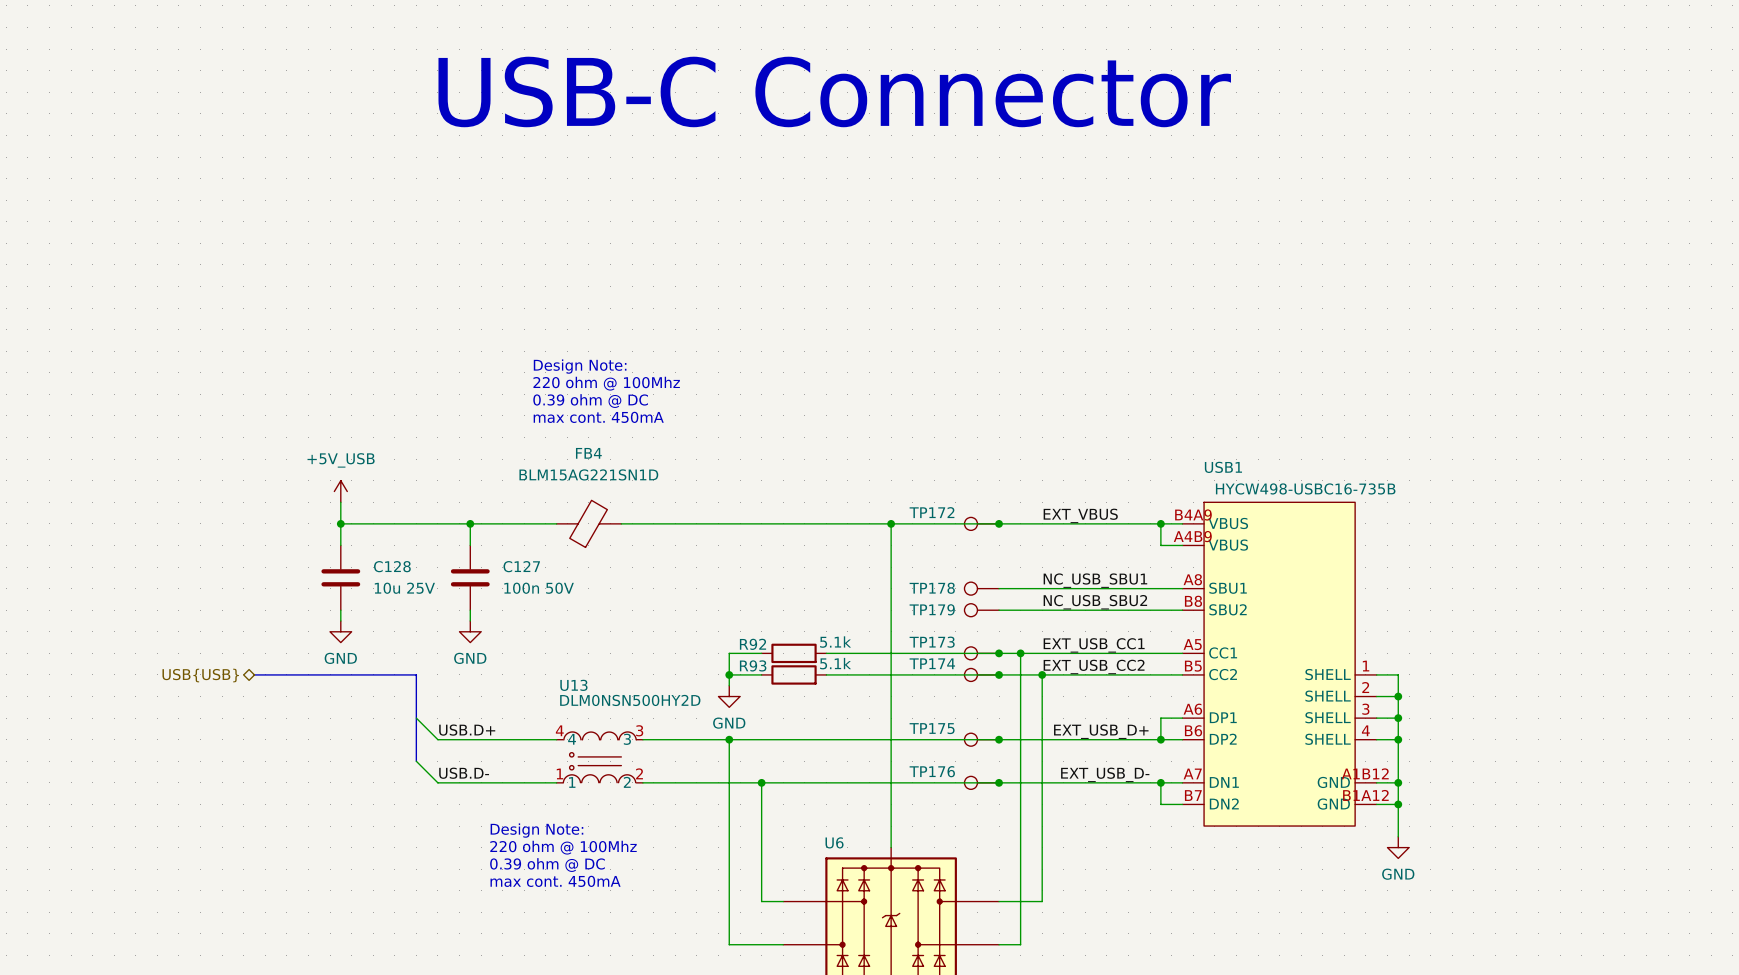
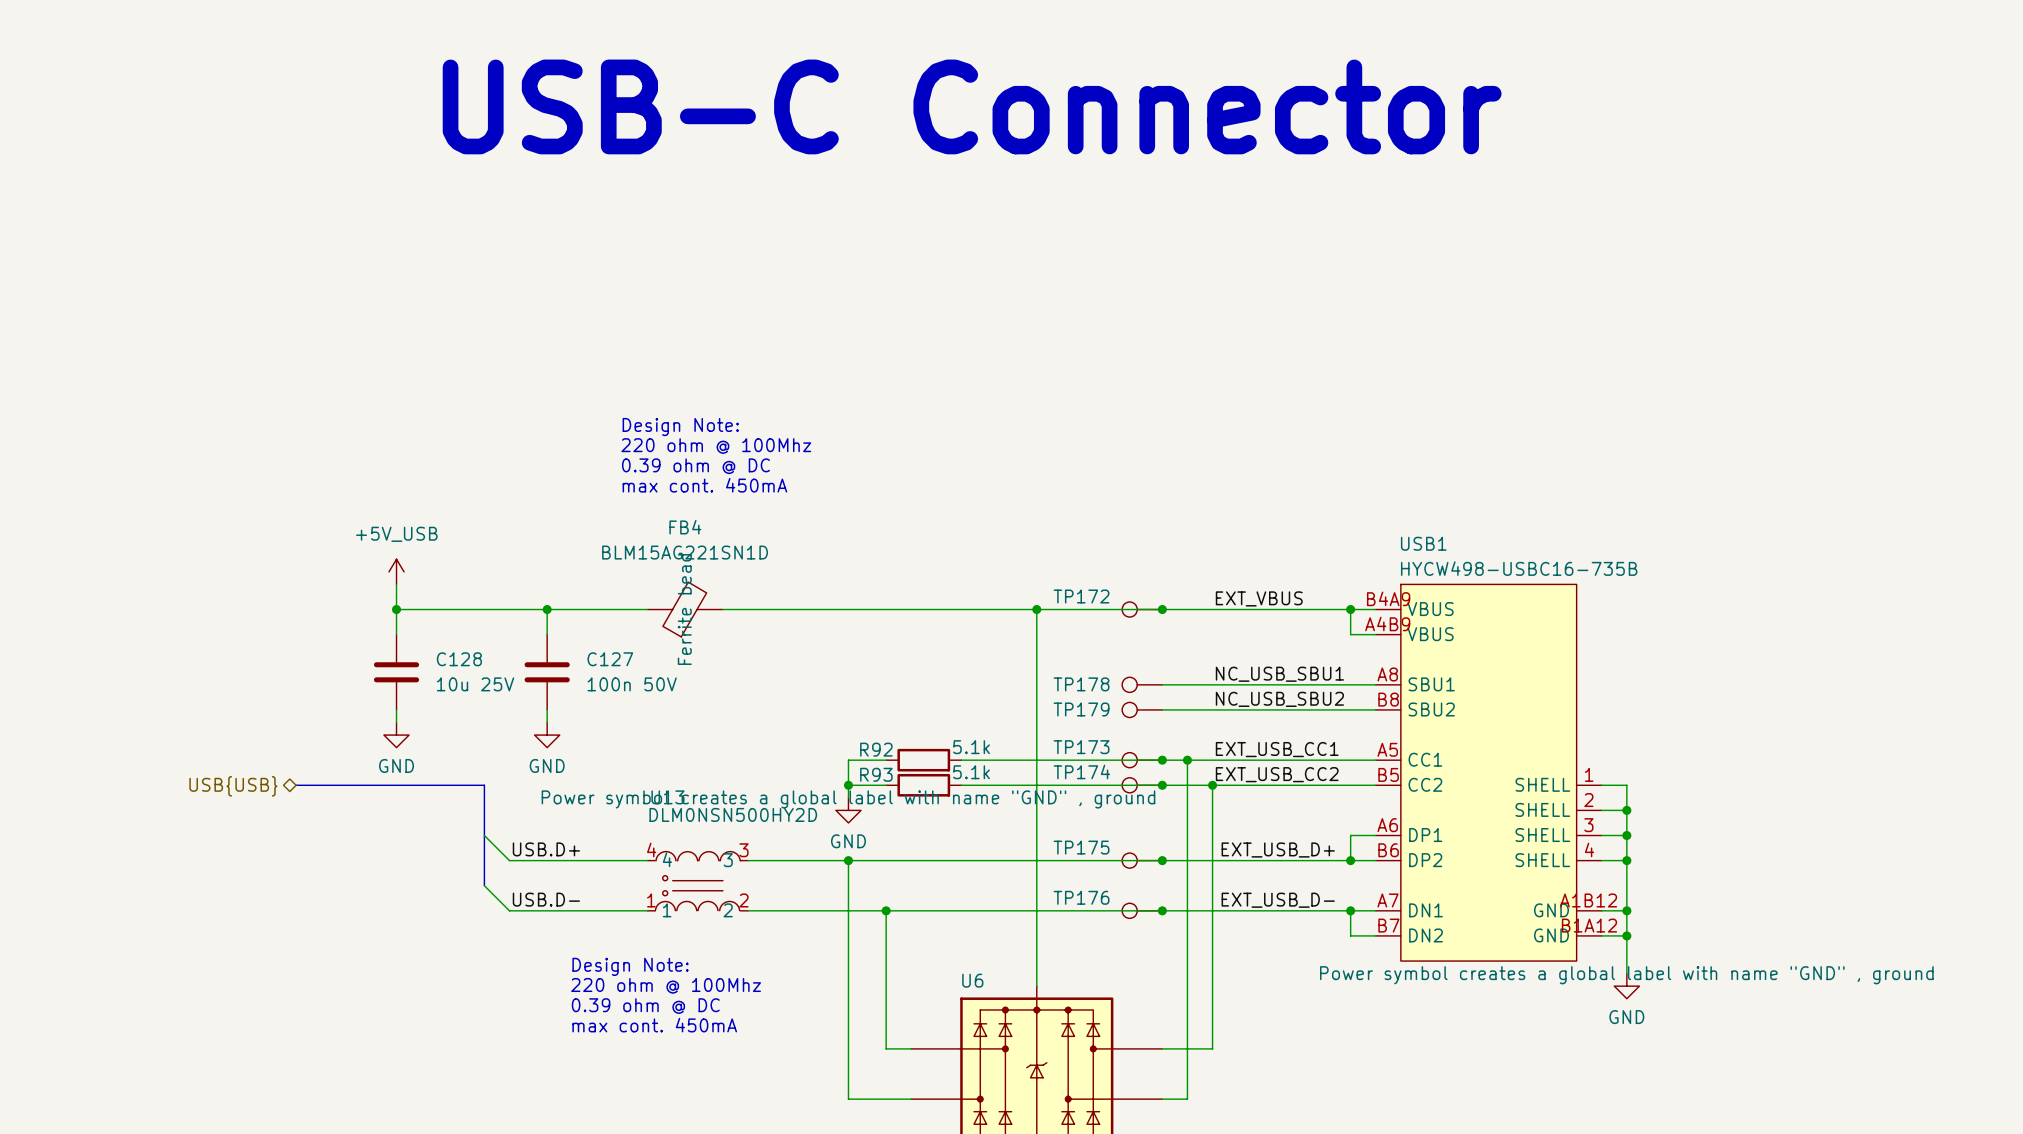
FB4 text: none -> Ferrite bead (684, 609)
power symbol text: none -> Power symbol creates a global label with name "GND" , ground (848, 799)
power symbol text: none -> Power symbol creates a global label with name "GND" , ground (1626, 975)

